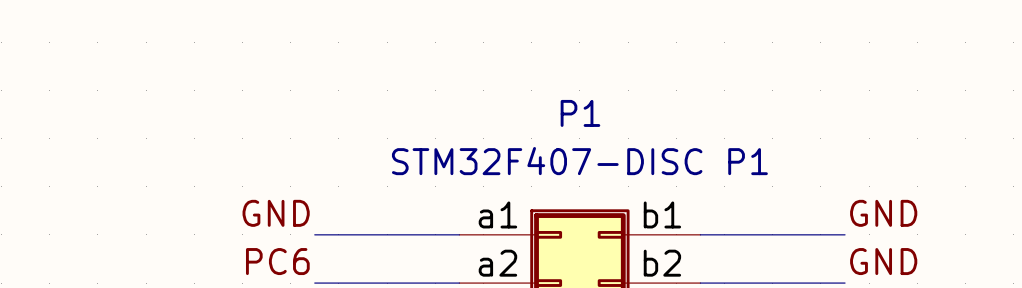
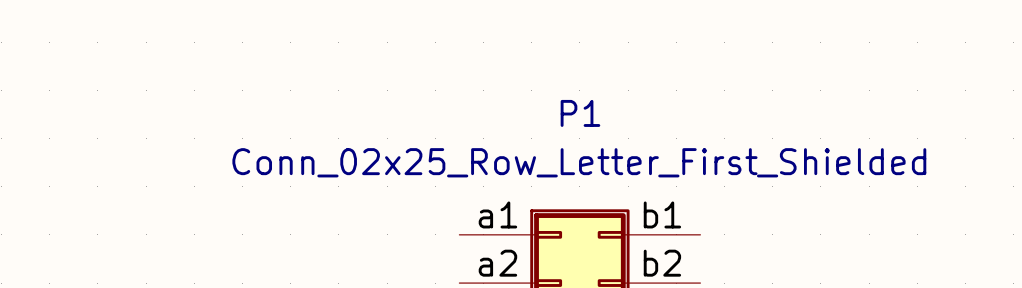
P1 value: STM32F407-DISC P1 (579, 161) -> Conn_02x25_Row_Letter_First_Shielded (579, 162)
label: GND (276, 213) -> none
label: GND (883, 213) -> none
wire: (314, 234) (459, 234) -> none
wire: (700, 234) (845, 234) -> none
label: PC6 (277, 261) -> none
label: GND (883, 261) -> none
wire: (314, 283) (459, 283) -> none
wire: (700, 283) (845, 283) -> none

